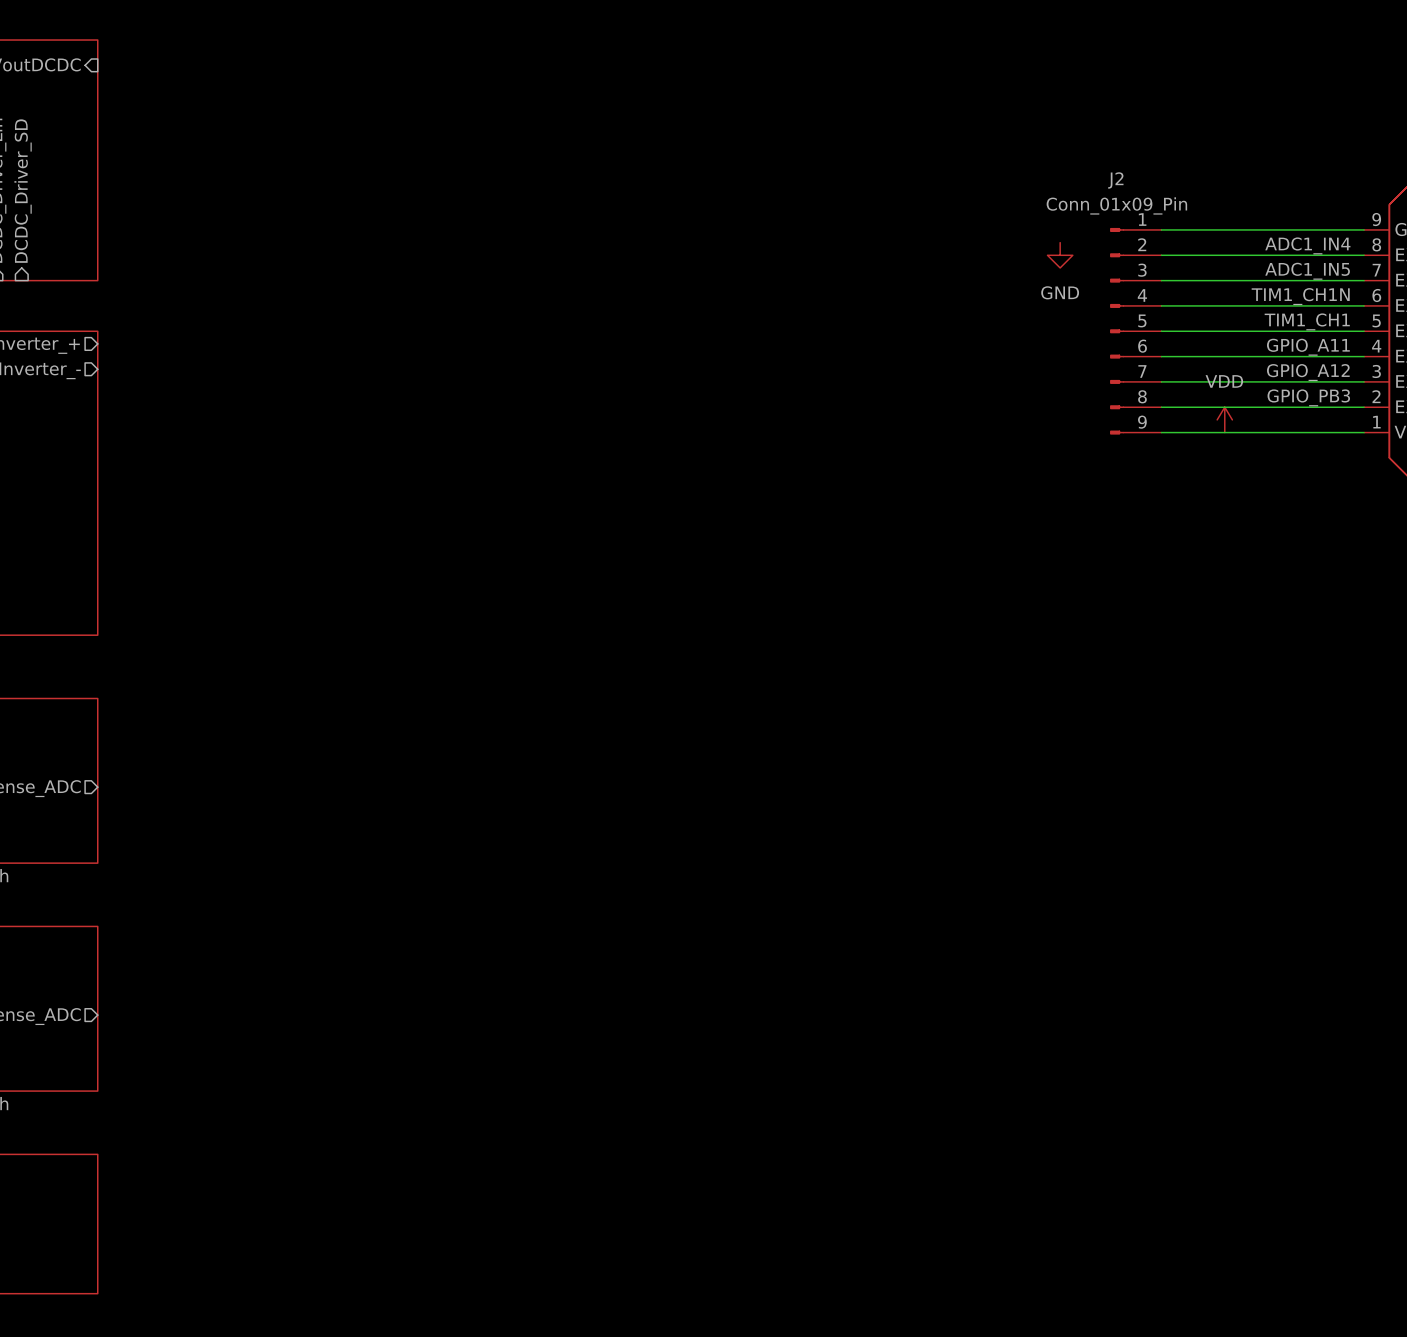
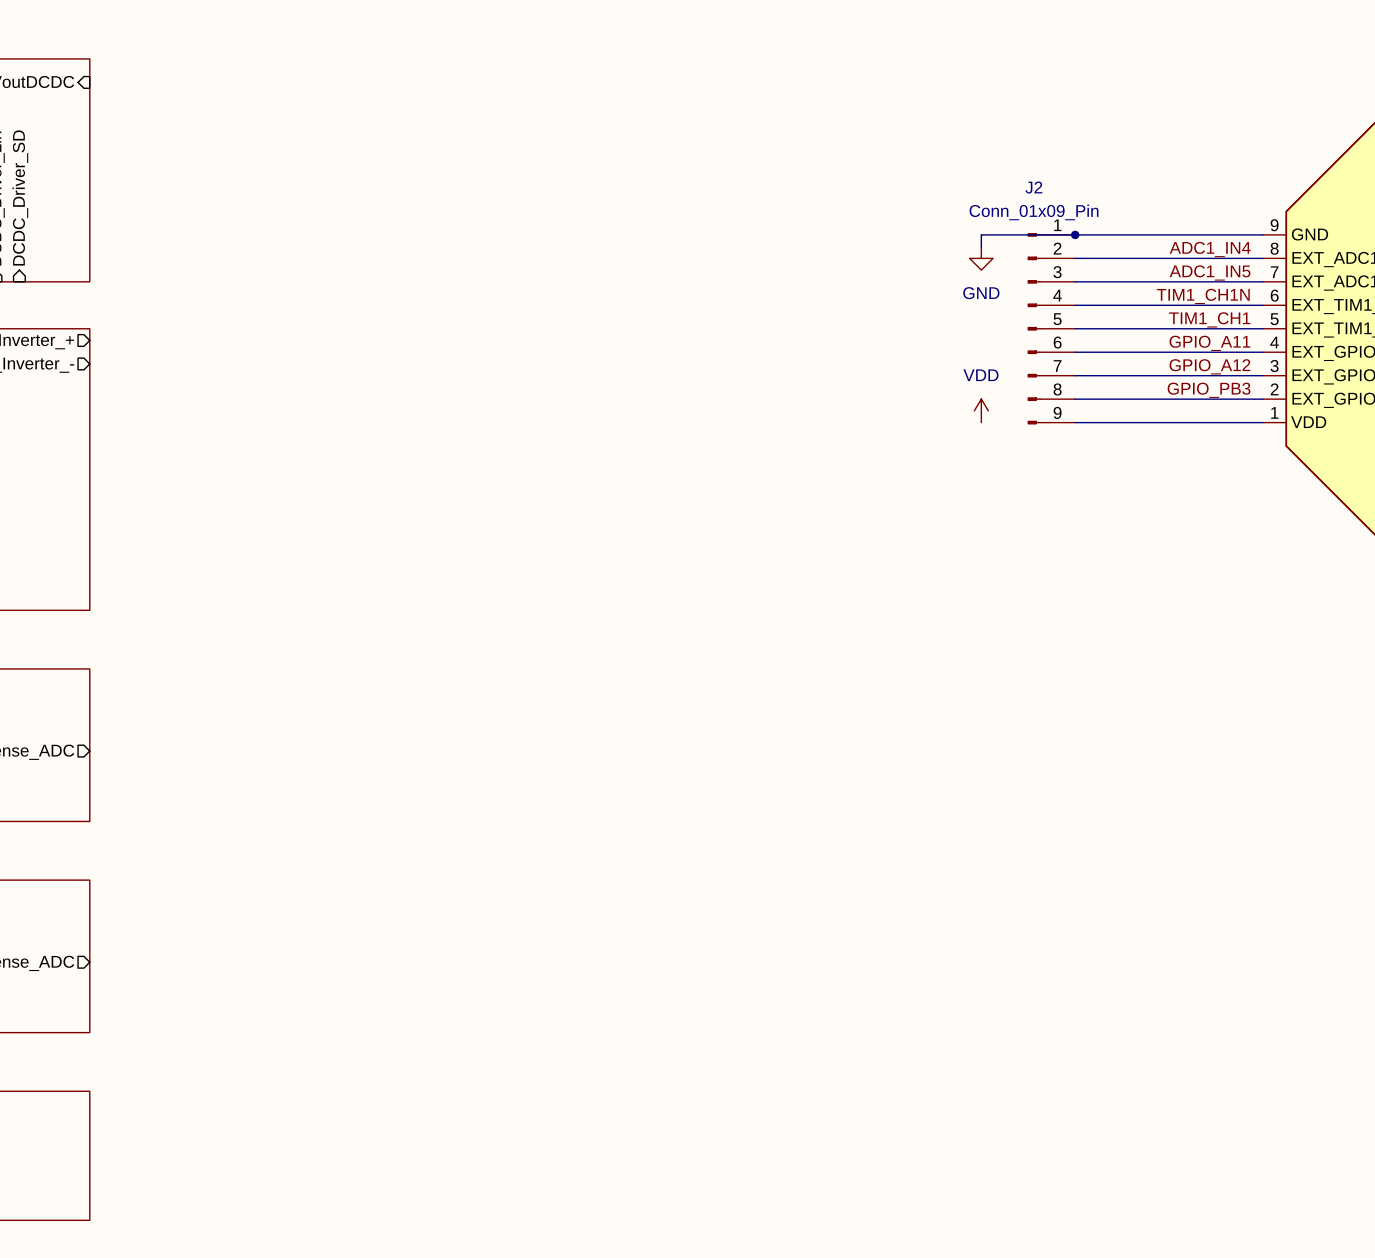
wire: none -> (1075, 234) (981, 234) (981, 246)
junction: none -> (1075, 234)
power symbol position: VDD (1224, 419) -> VDD (981, 410)

